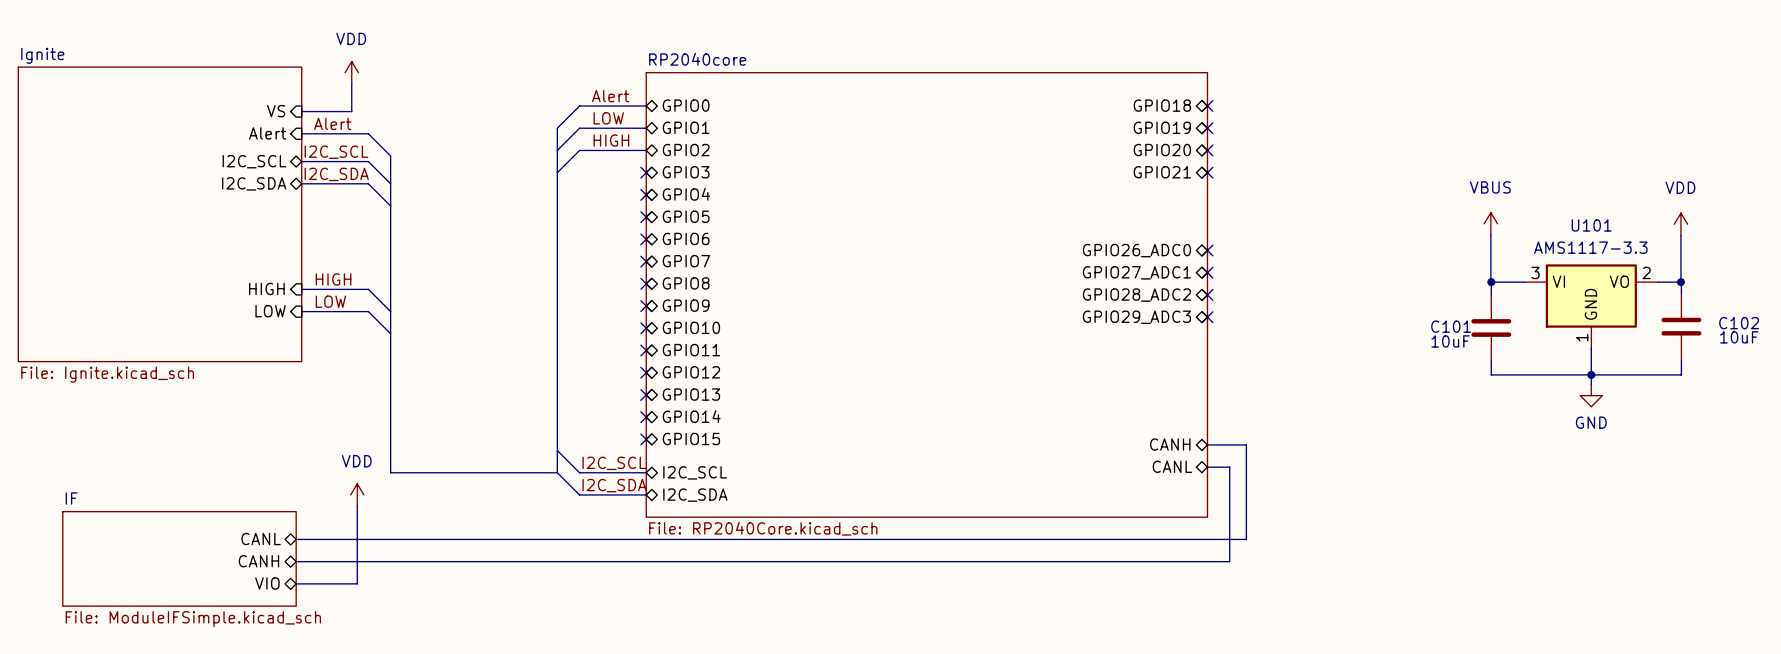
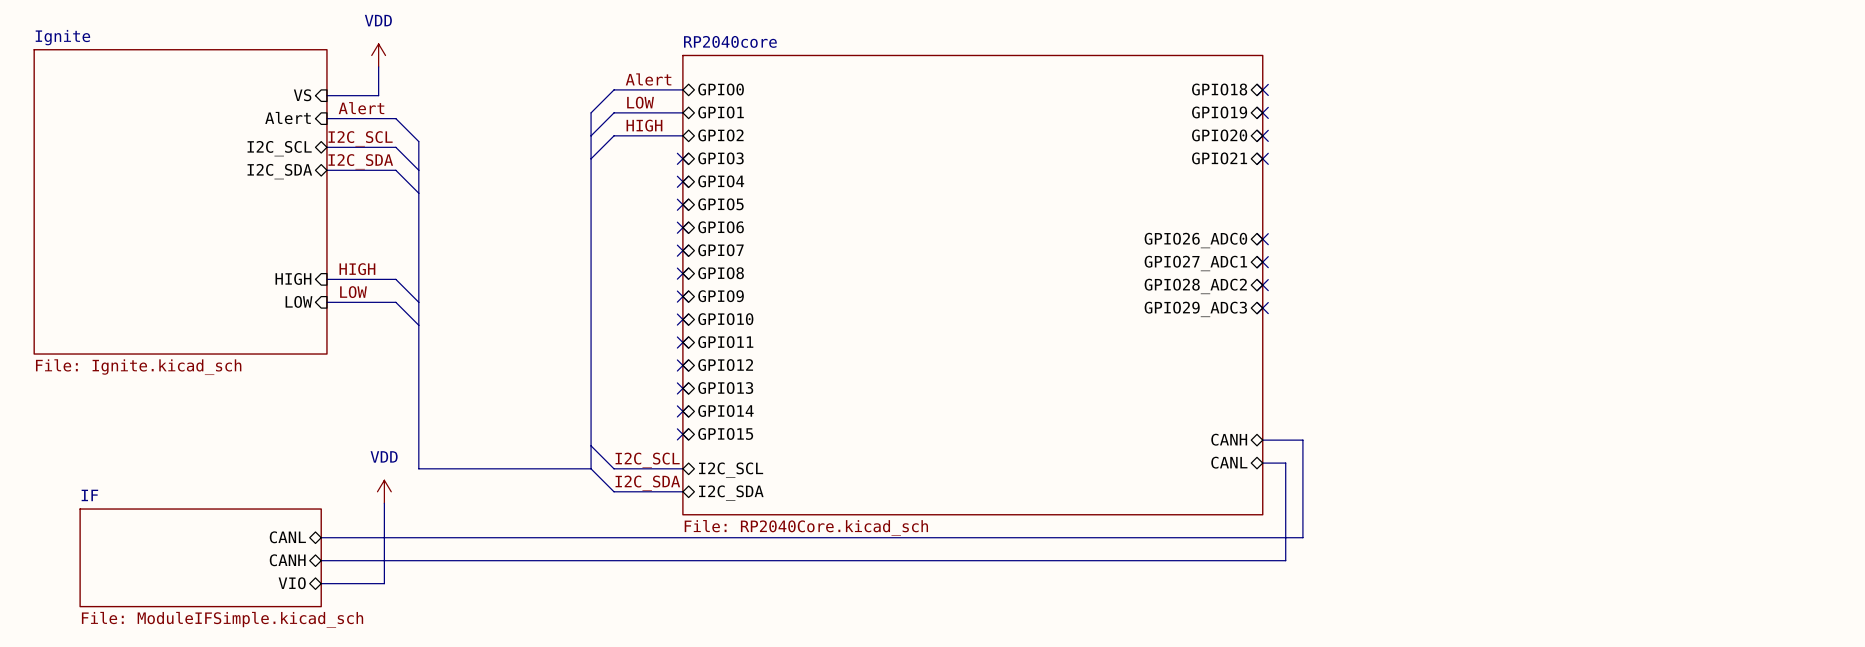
power symbol: VBUS (1490, 223) -> none
power symbol: VDD (1680, 224) -> none
wire: (1490, 234) (1490, 282) (1524, 282) -> none
wire: (1680, 235) (1680, 282) -> none
wire: (1491, 282) (1491, 294) -> none
junction: (1491, 282) -> none
wire: (1658, 282) (1681, 282) (1681, 293) -> none
junction: (1680, 282) -> none
U101: AMS1117-3.3 (1591, 306) -> none
C102: 10uF (1681, 326) -> none
C101: 10uF (1491, 327) -> none
wire: (1591, 348) (1591, 384) -> none
wire: (1681, 359) (1681, 374) (1491, 374) (1491, 361) -> none
junction: (1591, 374) -> none
power symbol: GND (1591, 395) -> none

